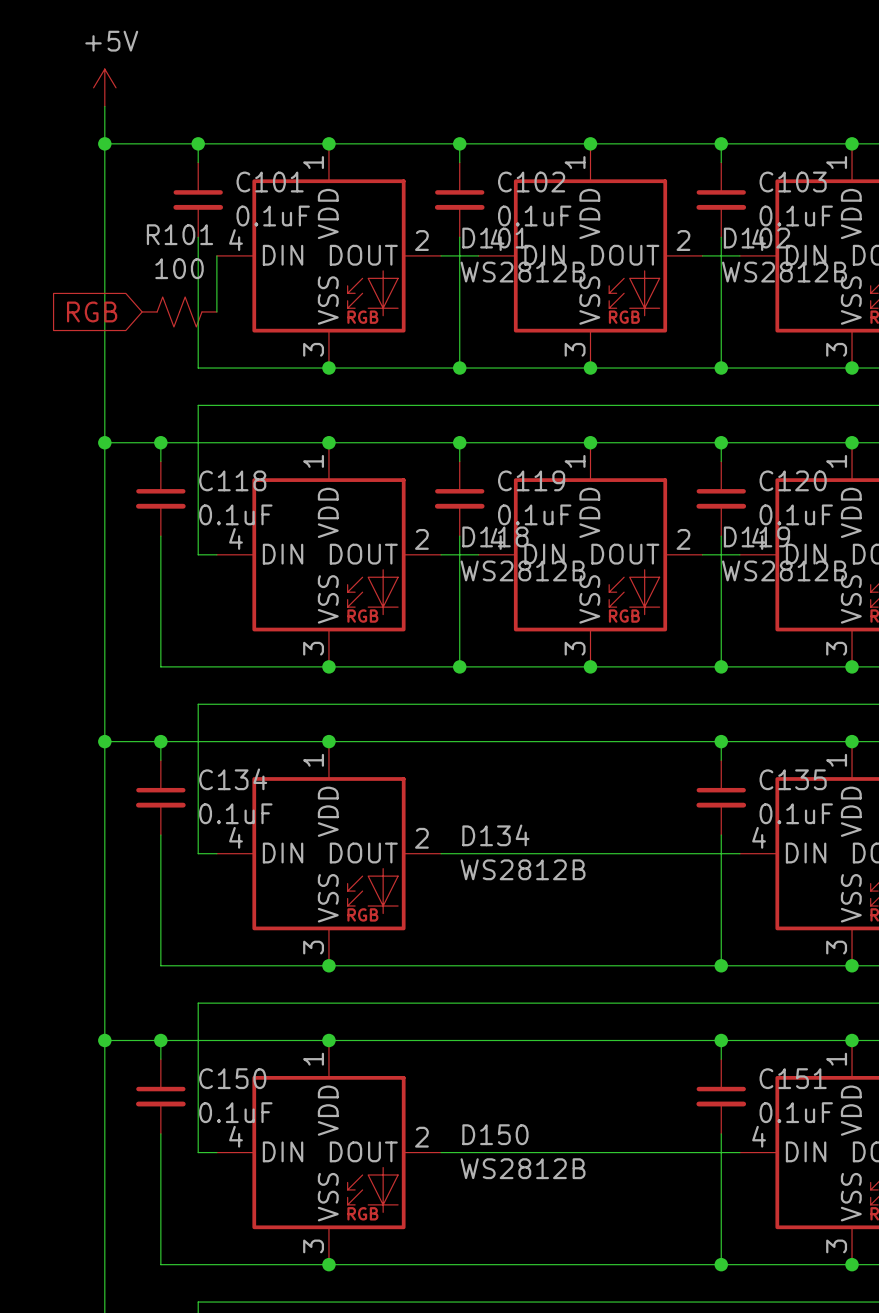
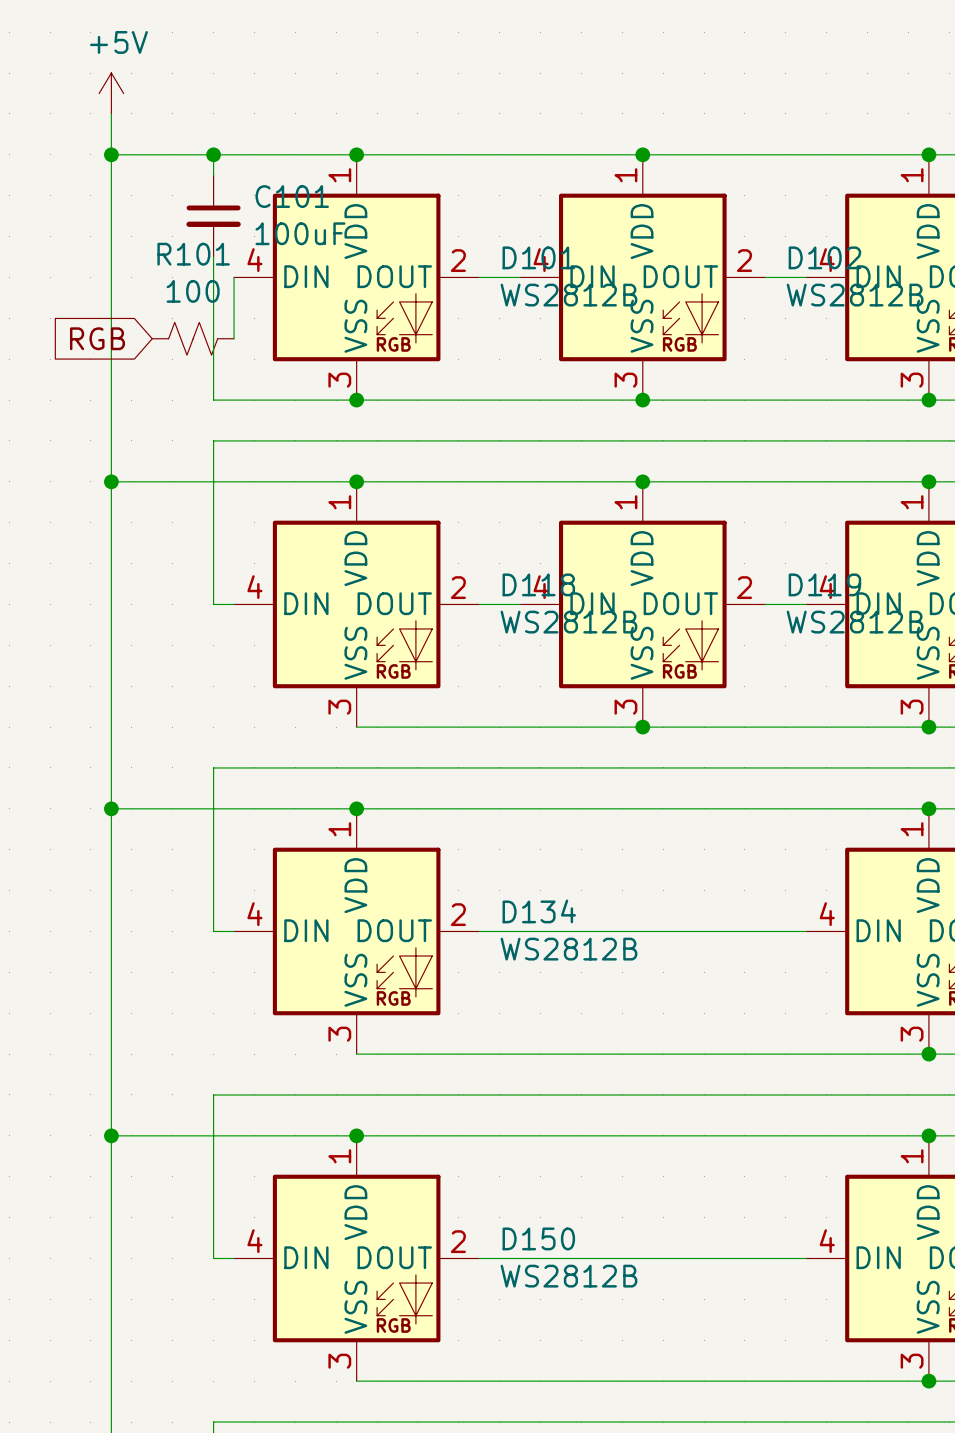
wire: (459, 143) (459, 162) -> none
junction: (459, 143) -> none
wire: (721, 143) (721, 162) -> none
junction: (721, 143) -> none
C102: 0.1uF (459, 199) -> none
C103: 0.1uF (721, 199) -> none
C101 value: 0.1uF (273, 216) -> 100uF (300, 233)
wire: (459, 237) (459, 368) -> none
wire: (721, 237) (721, 368) -> none
junction: (459, 368) -> none
junction: (721, 368) -> none
wire: (160, 442) (160, 461) -> none
junction: (160, 442) -> none
wire: (459, 442) (459, 461) -> none
junction: (459, 442) -> none
wire: (721, 442) (721, 461) -> none
junction: (721, 442) -> none
C118: 0.1uF (160, 498) -> none
C119: 0.1uF (459, 498) -> none
C120: 0.1uF (721, 498) -> none
wire: (160, 536) (160, 666) (328, 666) -> none
wire: (459, 536) (459, 666) -> none
wire: (721, 536) (721, 666) -> none
junction: (328, 666) -> none
junction: (459, 666) -> none
junction: (721, 666) -> none
wire: (160, 741) (160, 760) -> none
junction: (160, 741) -> none
wire: (721, 741) (721, 760) -> none
junction: (721, 741) -> none
C134: 0.1uF (160, 797) -> none
C135: 0.1uF (721, 797) -> none
wire: (160, 835) (160, 965) (328, 965) -> none
wire: (721, 835) (721, 965) -> none
junction: (328, 965) -> none
junction: (721, 965) -> none
wire: (160, 1040) (160, 1059) -> none
junction: (160, 1040) -> none
wire: (721, 1040) (721, 1059) -> none
junction: (721, 1040) -> none
C150: 0.1uF (160, 1096) -> none
C151: 0.1uF (721, 1096) -> none
wire: (160, 1133) (160, 1264) (328, 1264) -> none
wire: (721, 1133) (721, 1264) -> none
junction: (328, 1264) -> none
junction: (721, 1264) -> none

